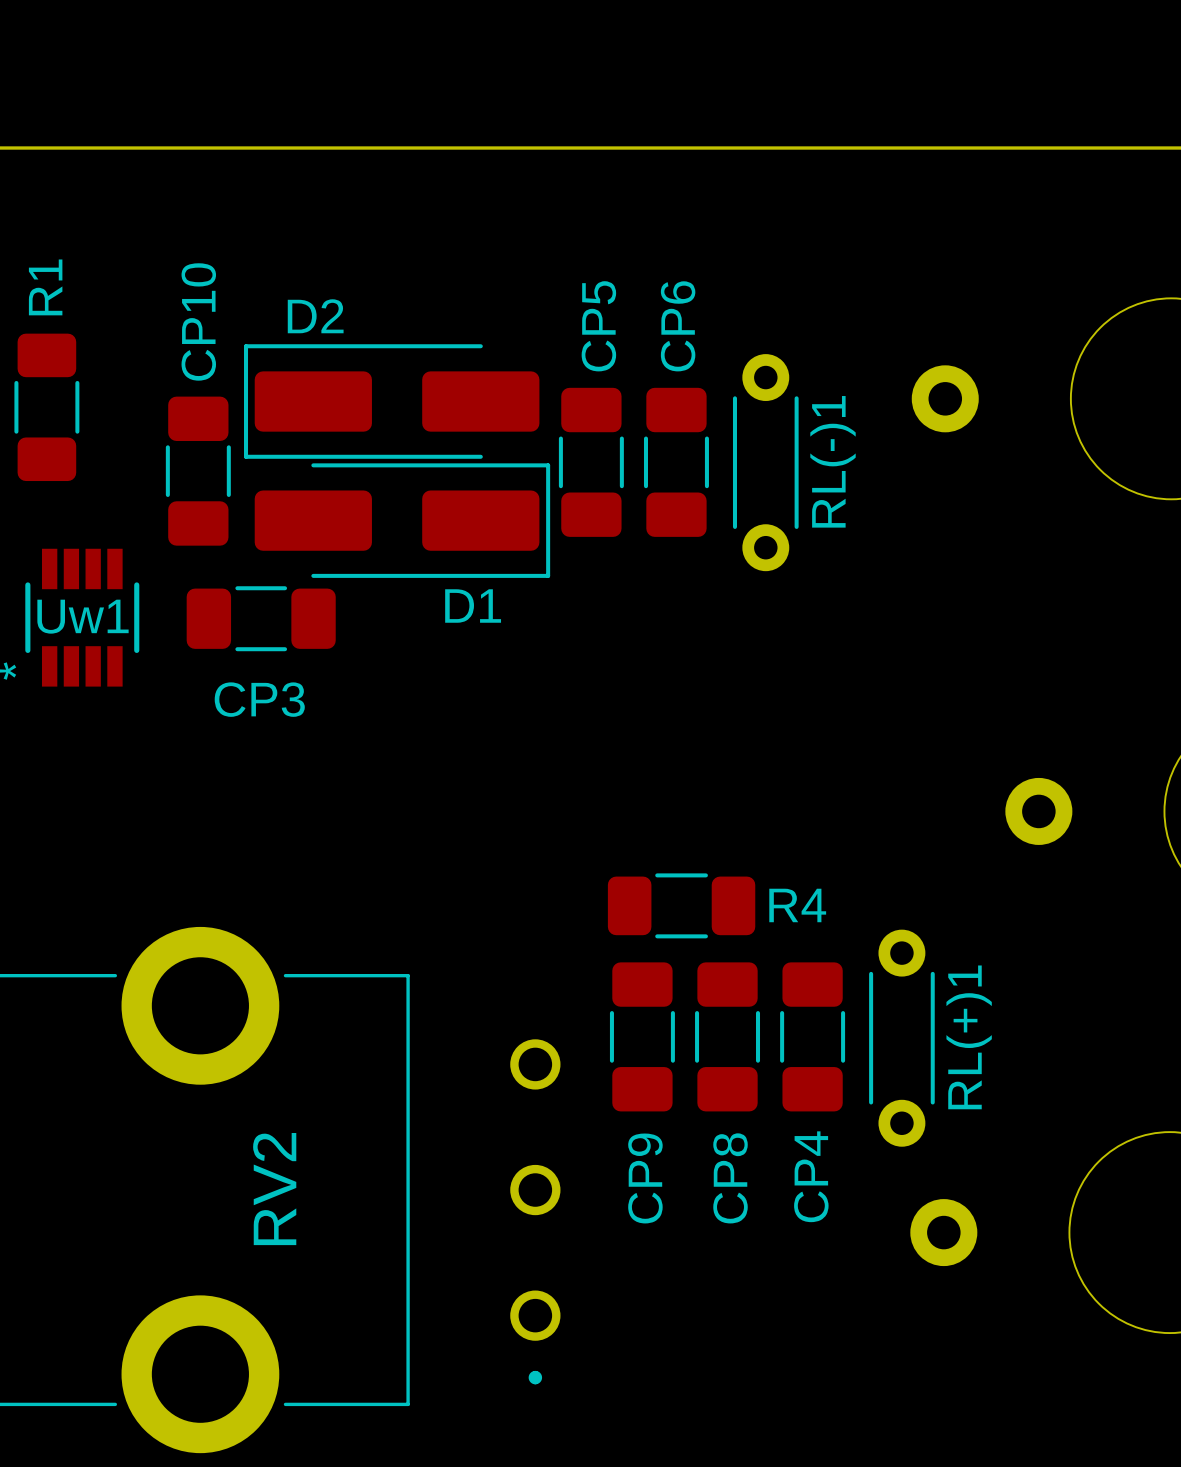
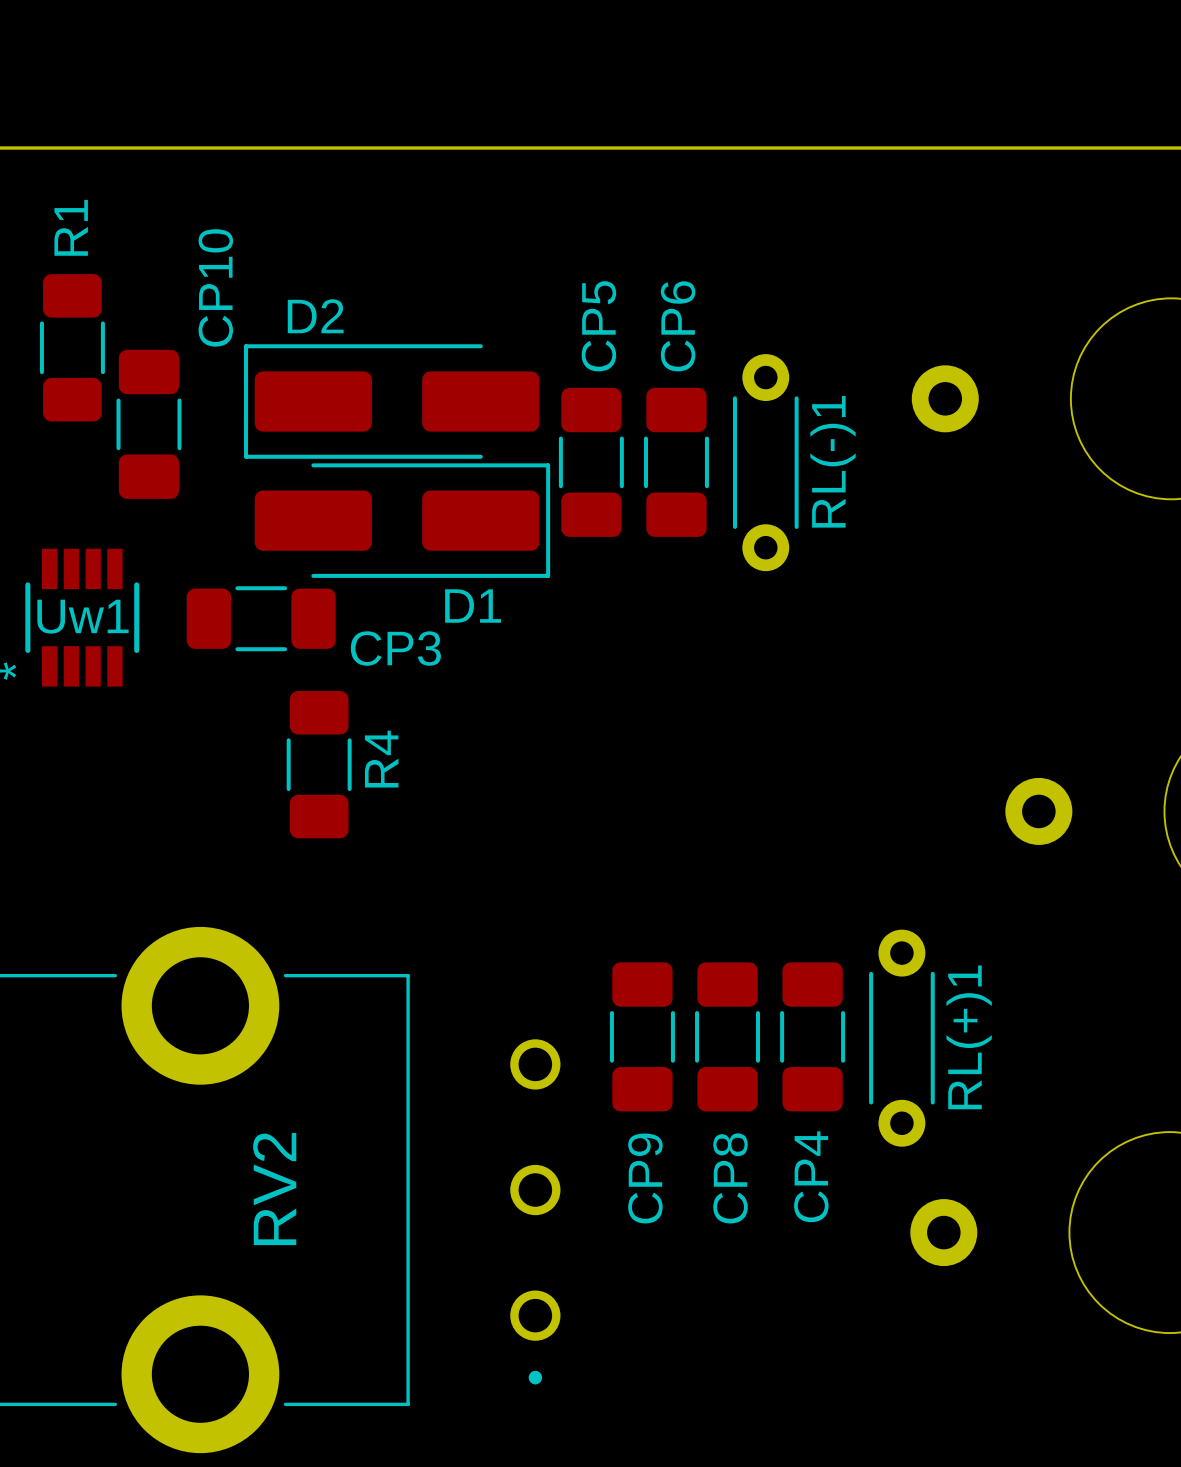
CP10 name position: CP10 (198, 321) -> CP10 (215, 287)
R1 position: (46, 407) -> (72, 347)
CP10 position: (198, 471) -> (148, 424)
CP3 name position: CP3 (259, 699) -> CP3 (395, 648)
R4 rotation: 0° (681, 905) -> 90° clockwise (319, 764)
R4 position: (681, 905) -> (319, 764)

